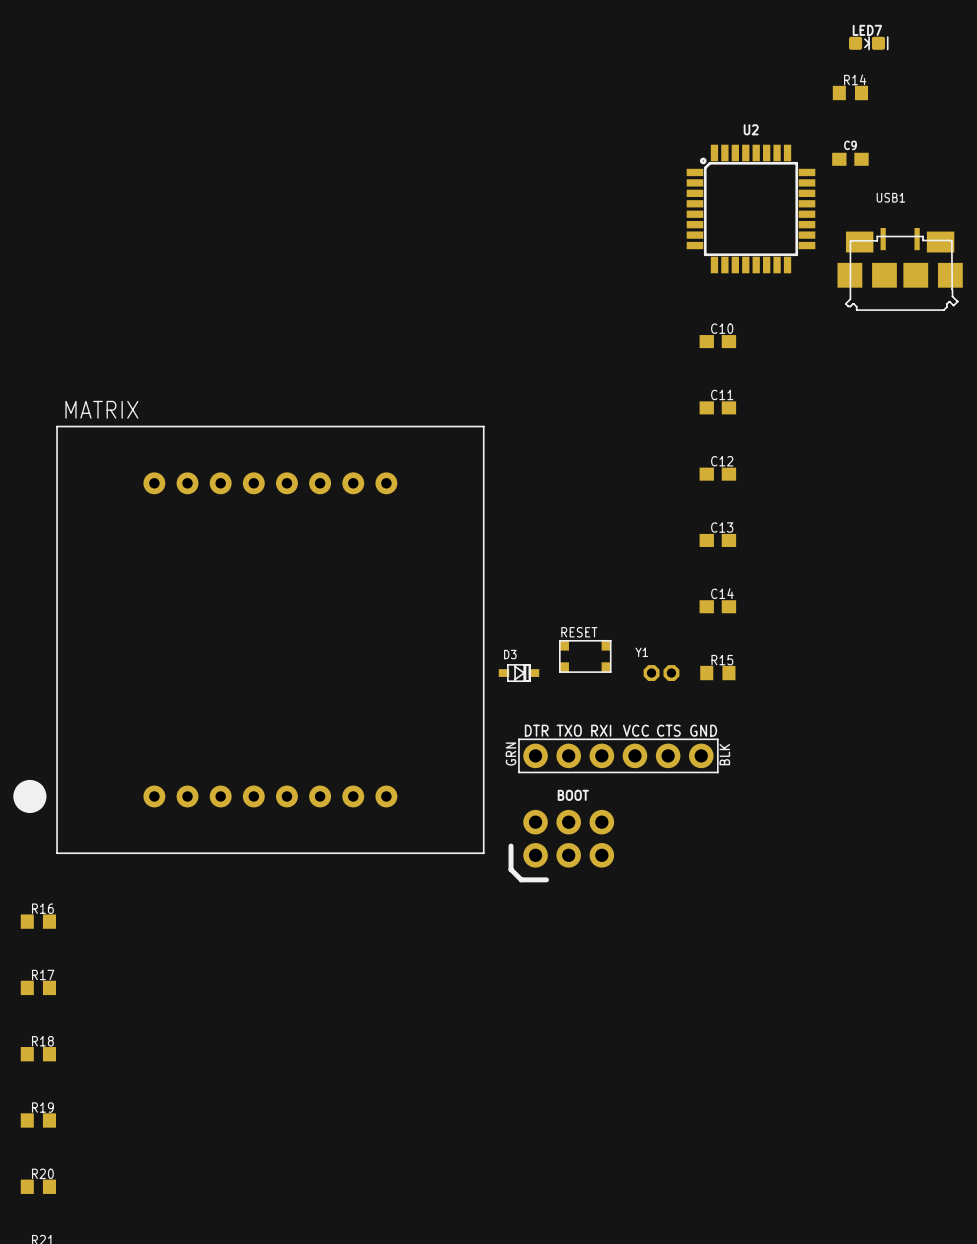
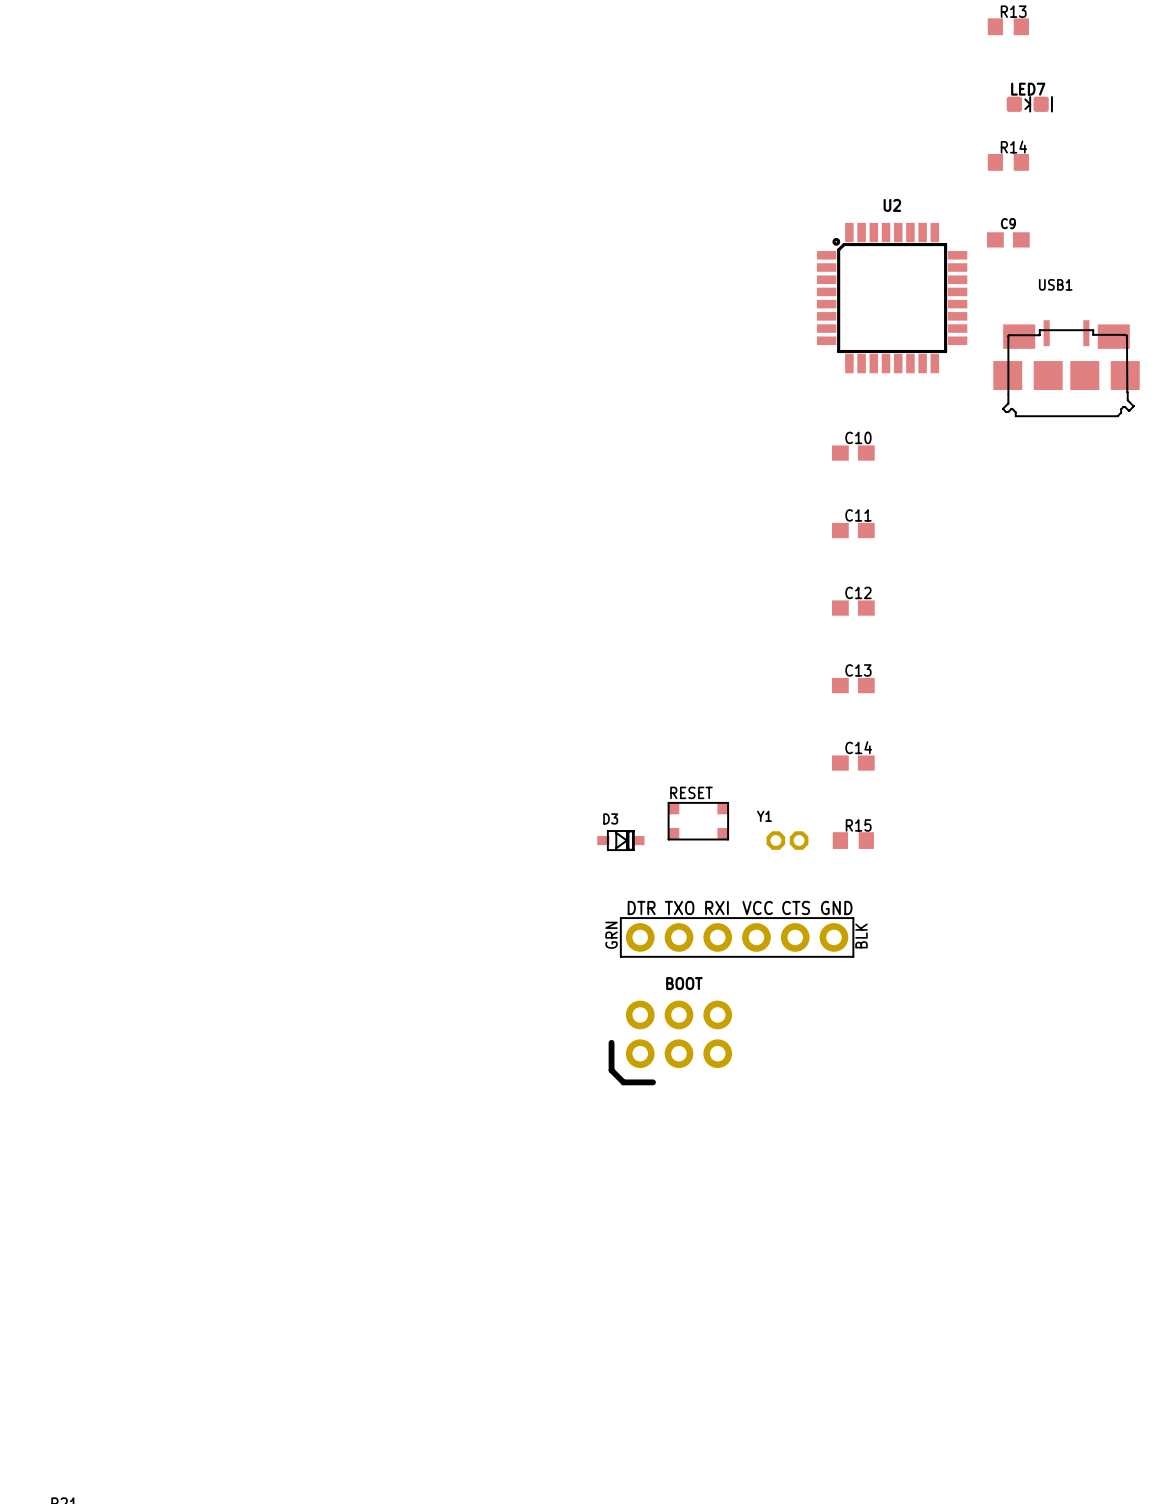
MATRIX: (248, 639) -> none
R16: (38, 921) -> none
R17: (38, 987) -> none
R18: (38, 1054) -> none
R19: (38, 1120) -> none
R20: (38, 1186) -> none

